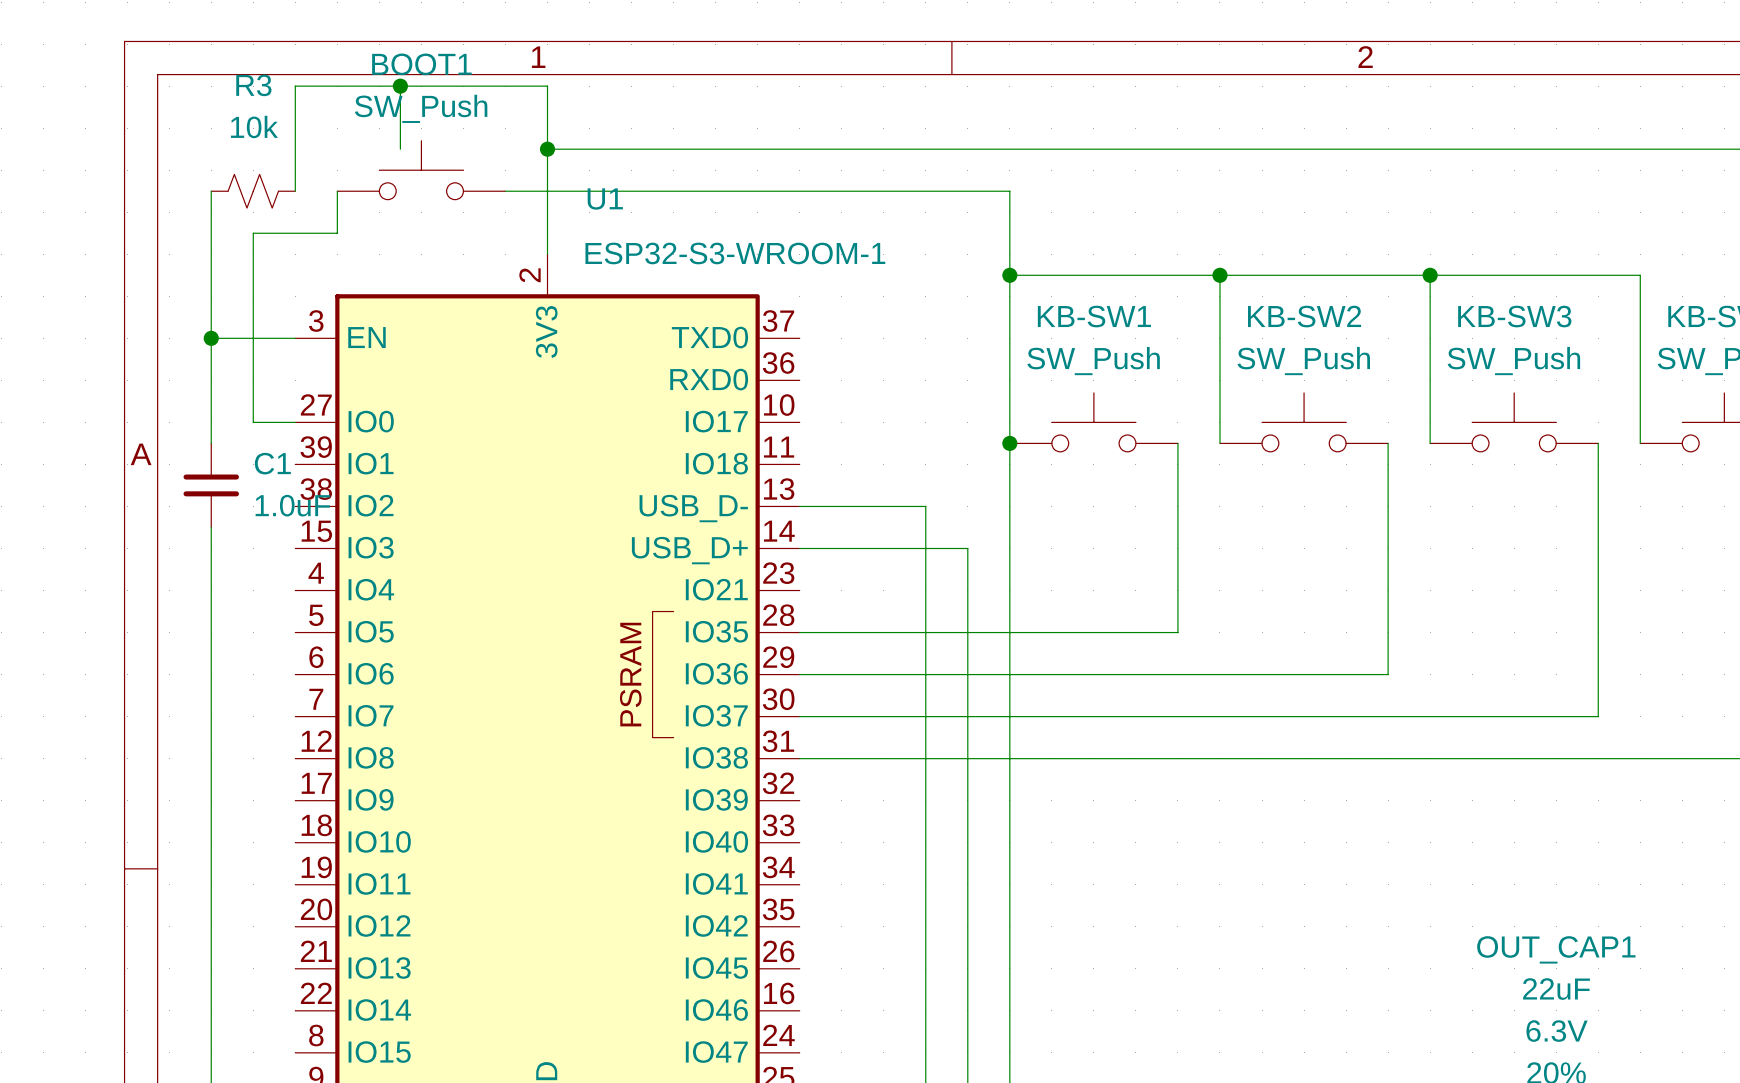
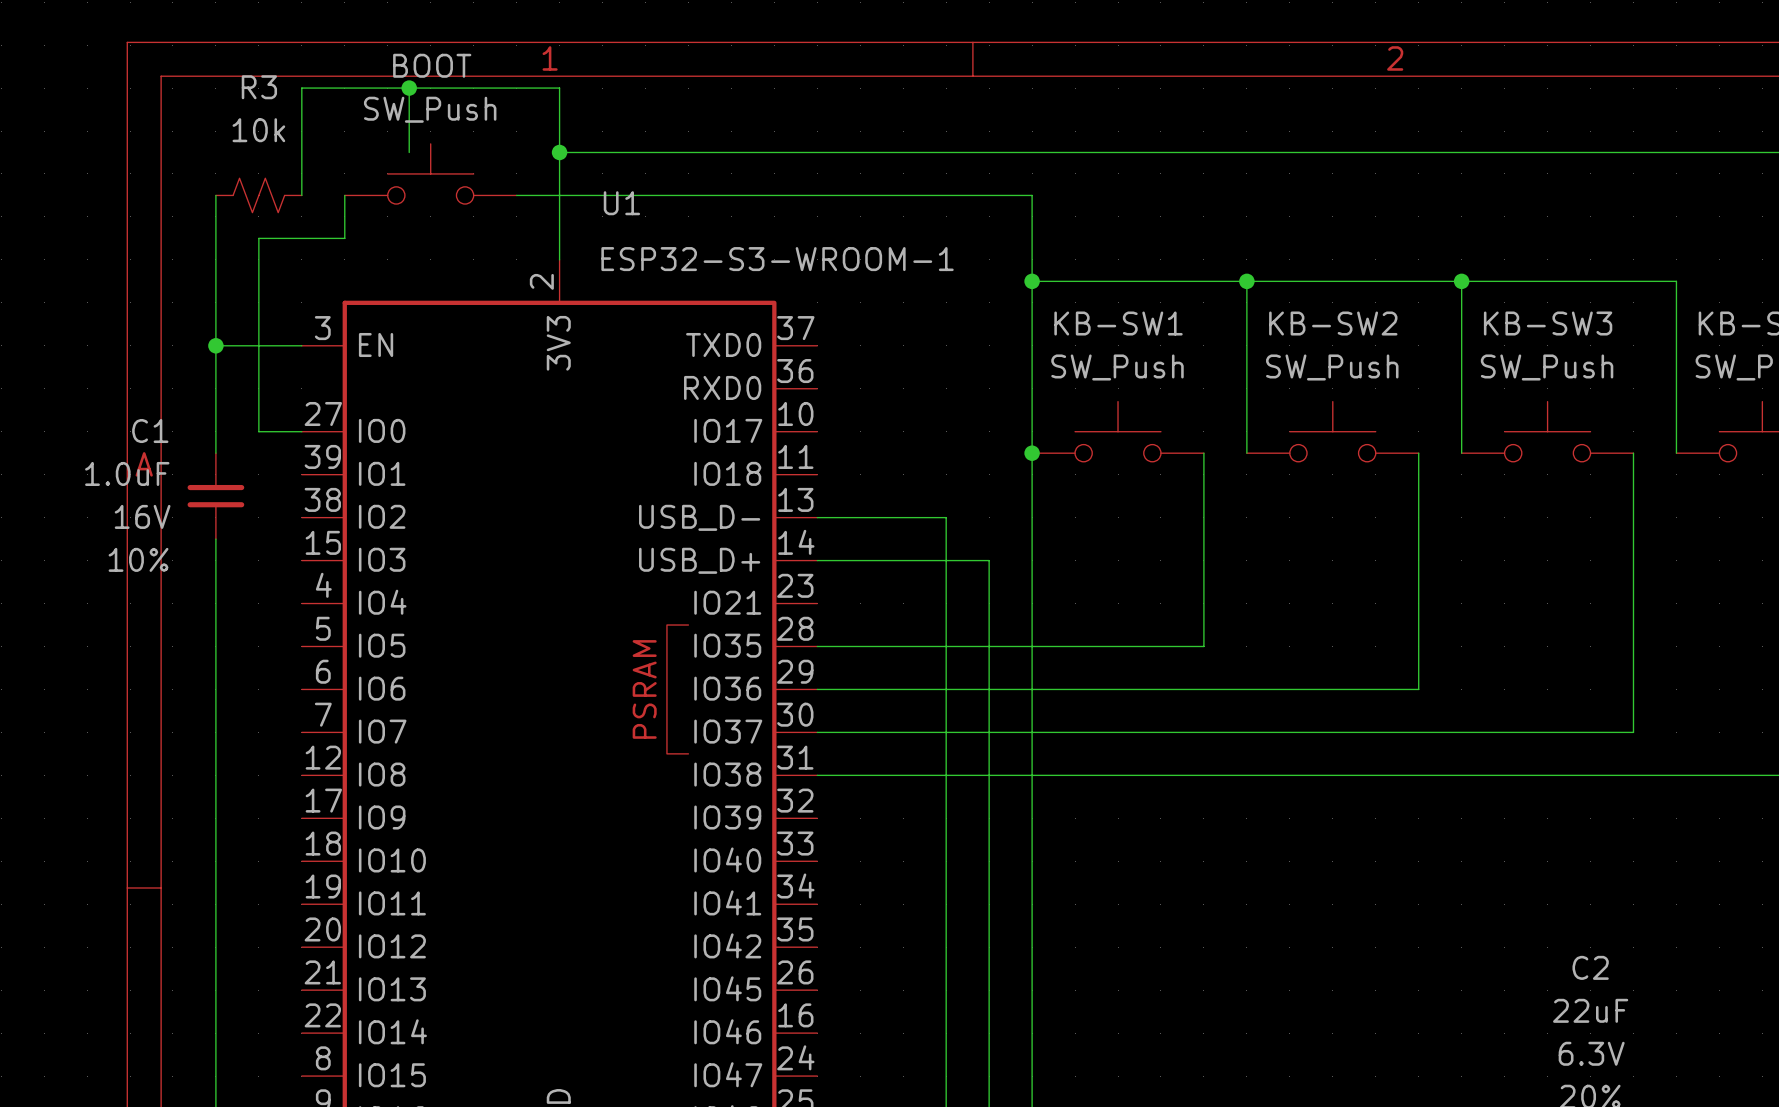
BOOT1 name: BOOT1 (421, 64) -> BOOT (432, 65)
C1 name position: C1 (272, 463) -> C1 (150, 431)
C1 text: none -> 16V (142, 516)
C1 value position: 1.0uF (292, 505) -> 1.0uF (127, 473)
C1 text: none -> 10% (138, 559)
OUT_CAP1 name: OUT_CAP1 (1556, 949) -> C2 (1590, 967)

